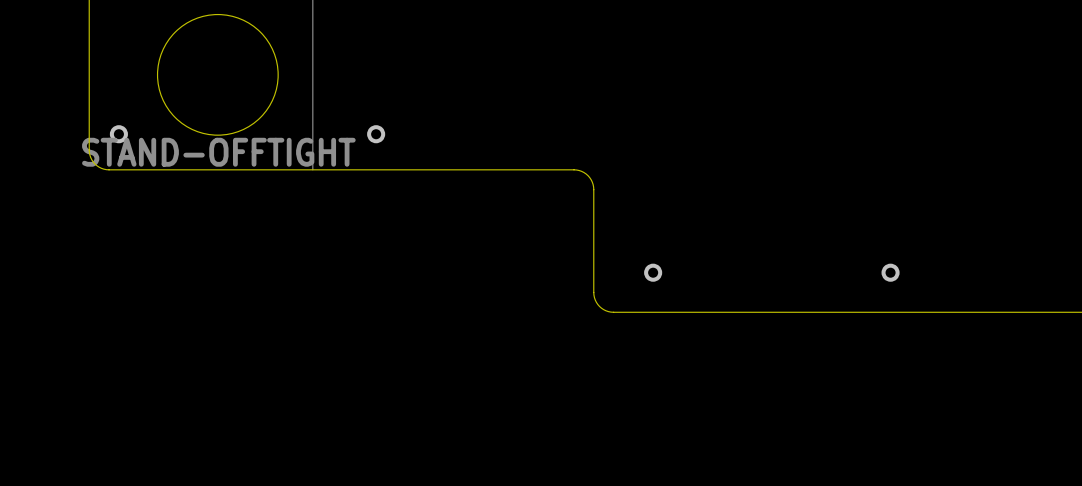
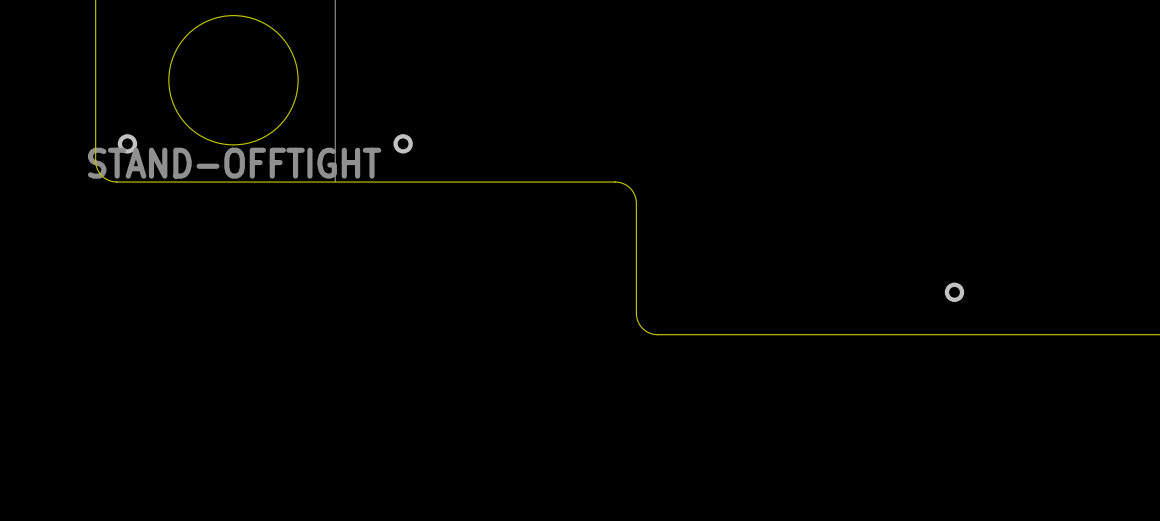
via: (653, 272) -> none

